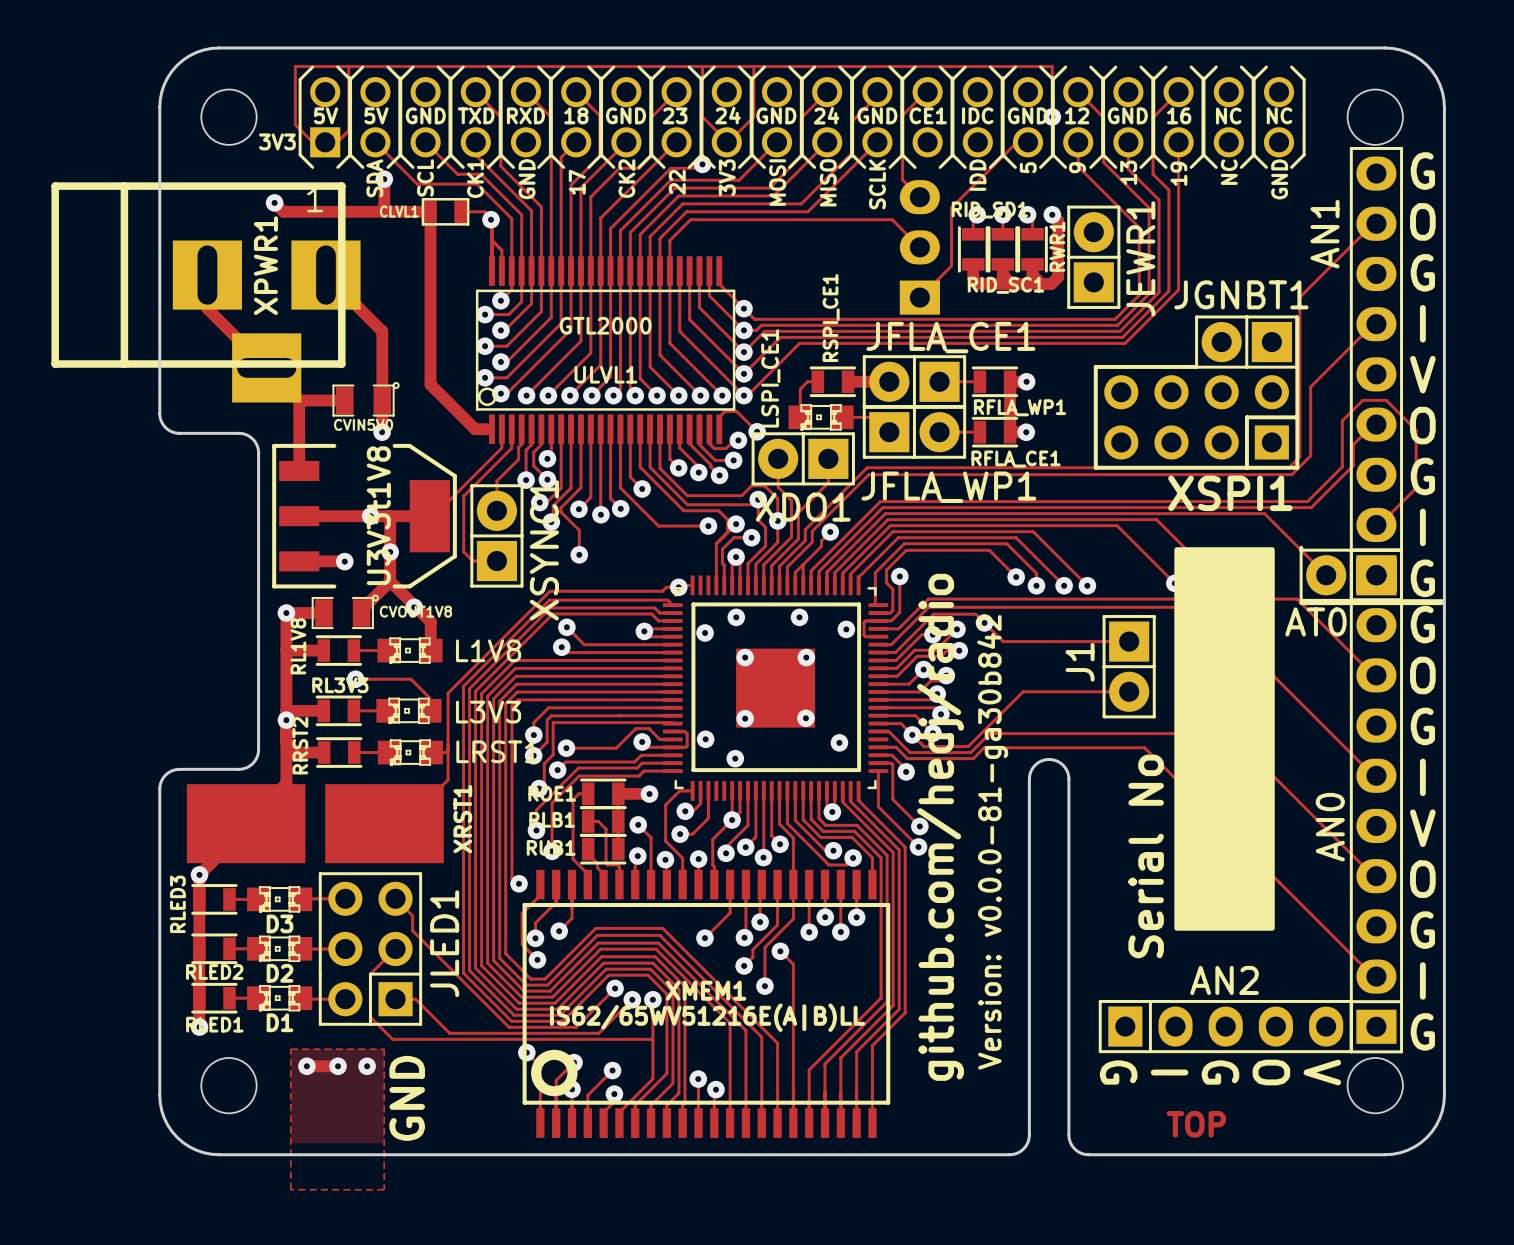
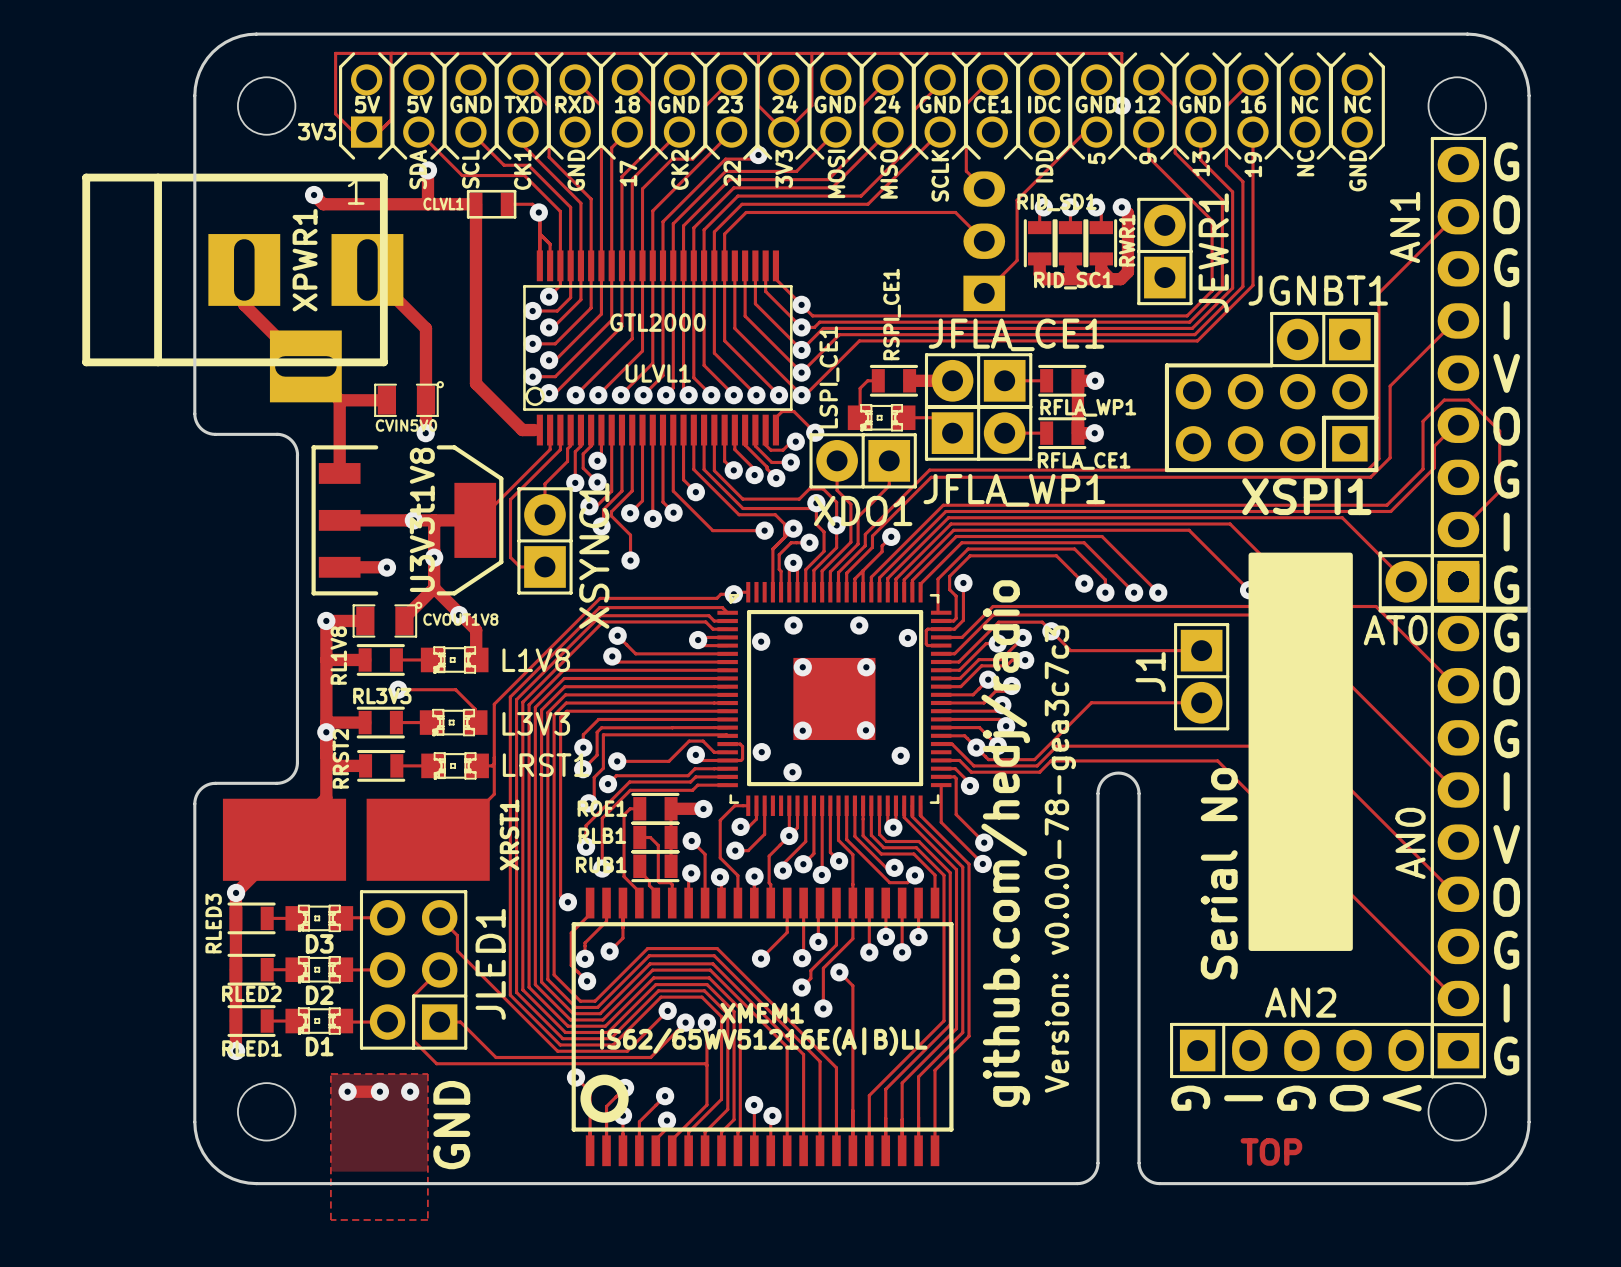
text: Version: v0.0.0-81-ga30b842 (992, 842) -> Version: v0.0.0-78-gea3c7c3 (1060, 859)

